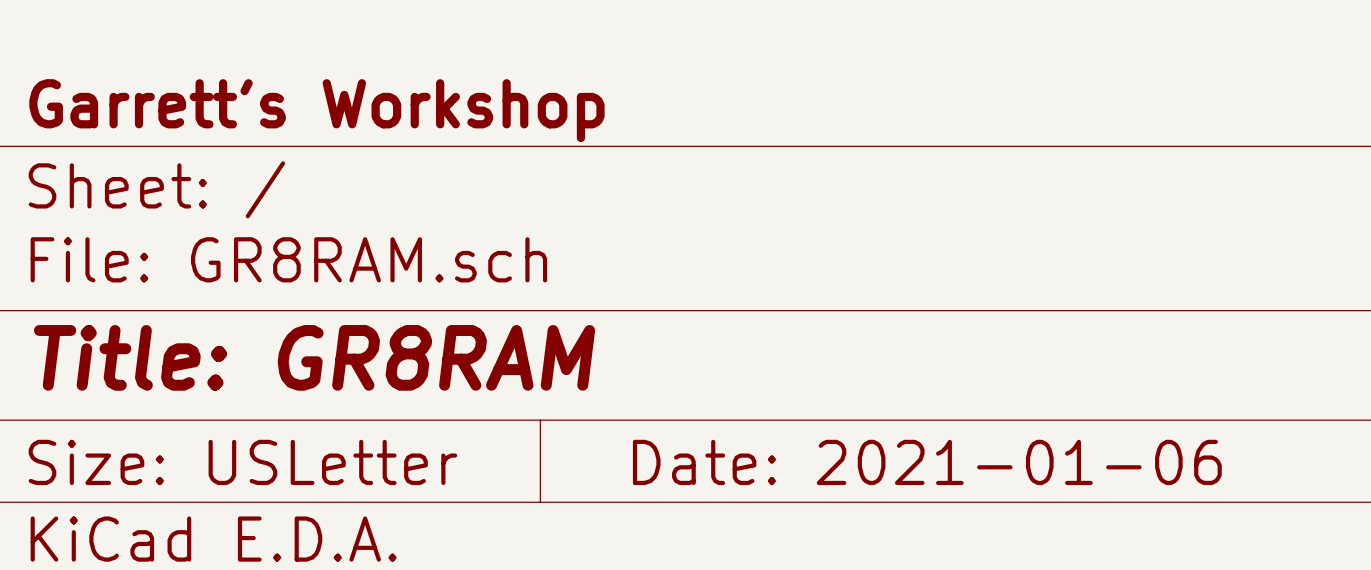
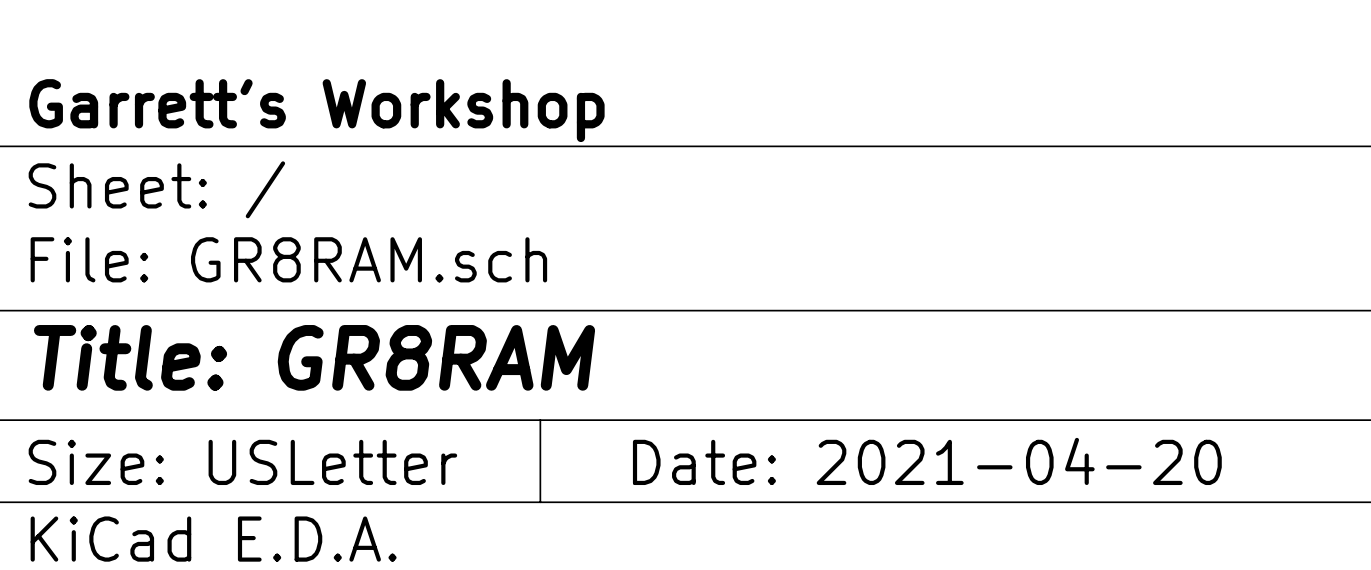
title block: Date: 2021-01-06 (927, 462) -> Date: 2021-04-20 (927, 461)

